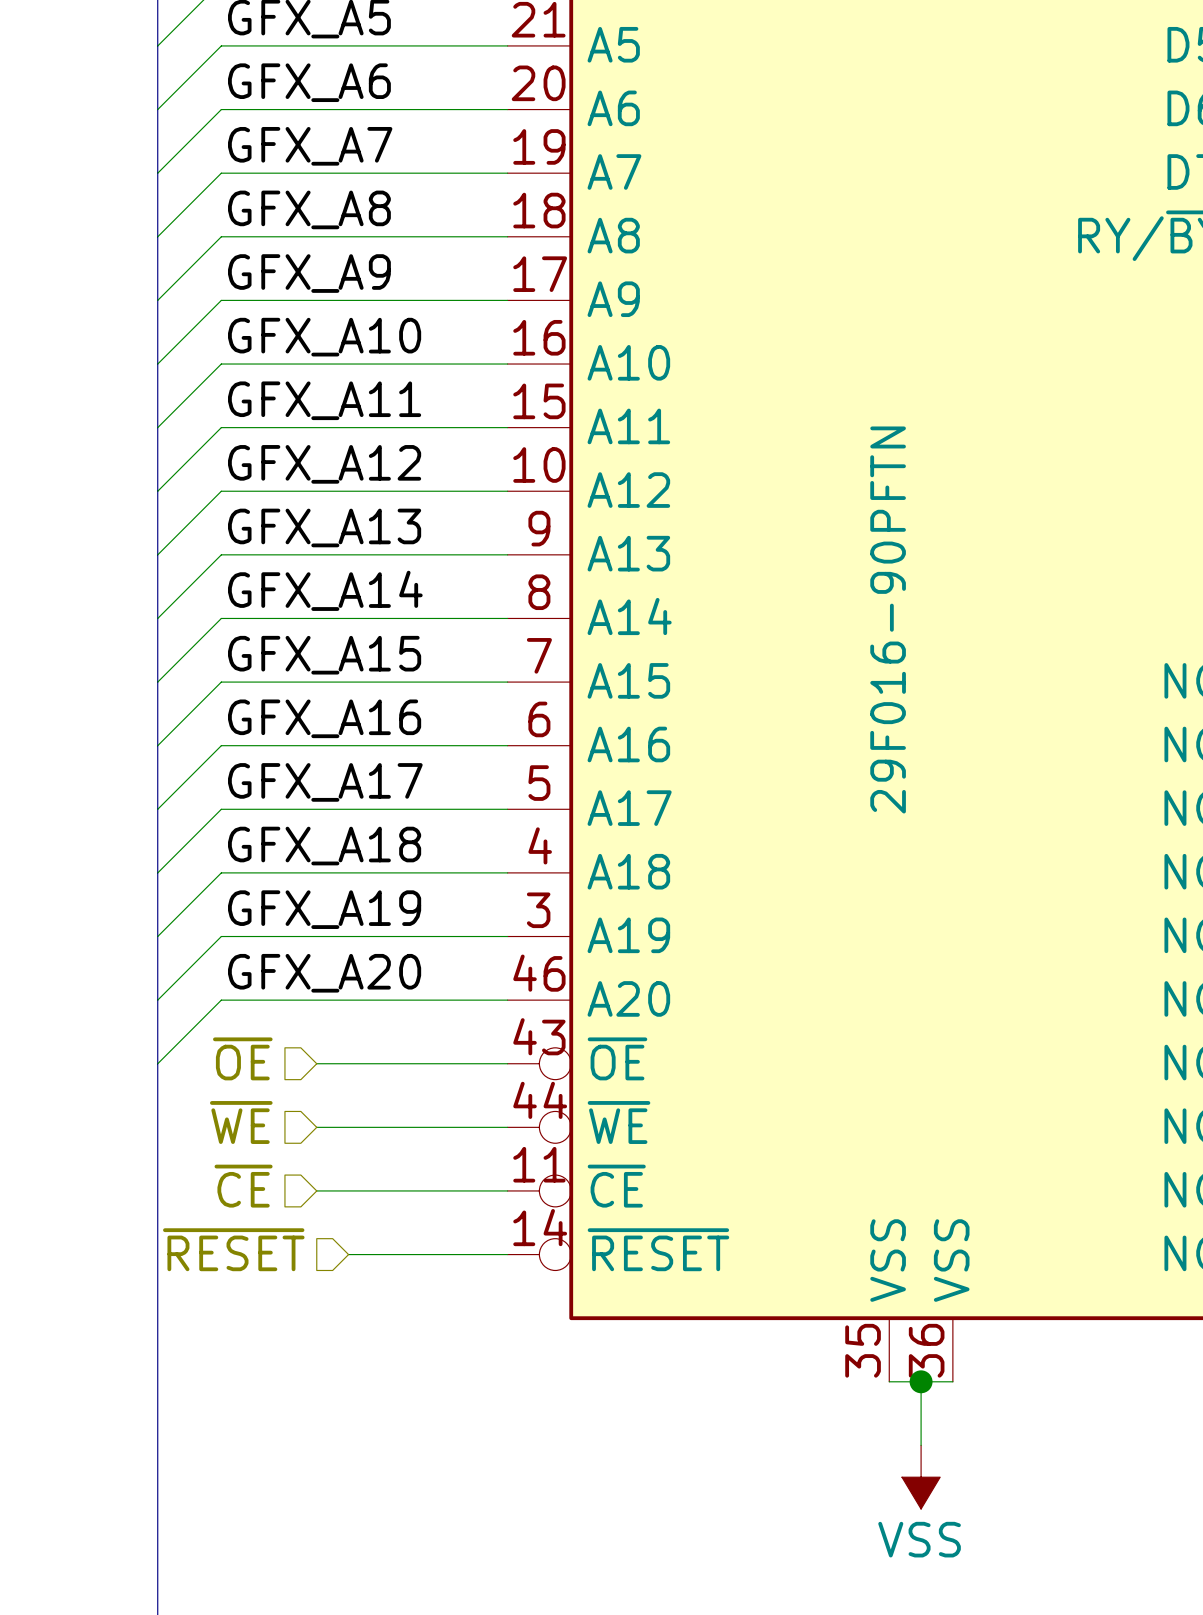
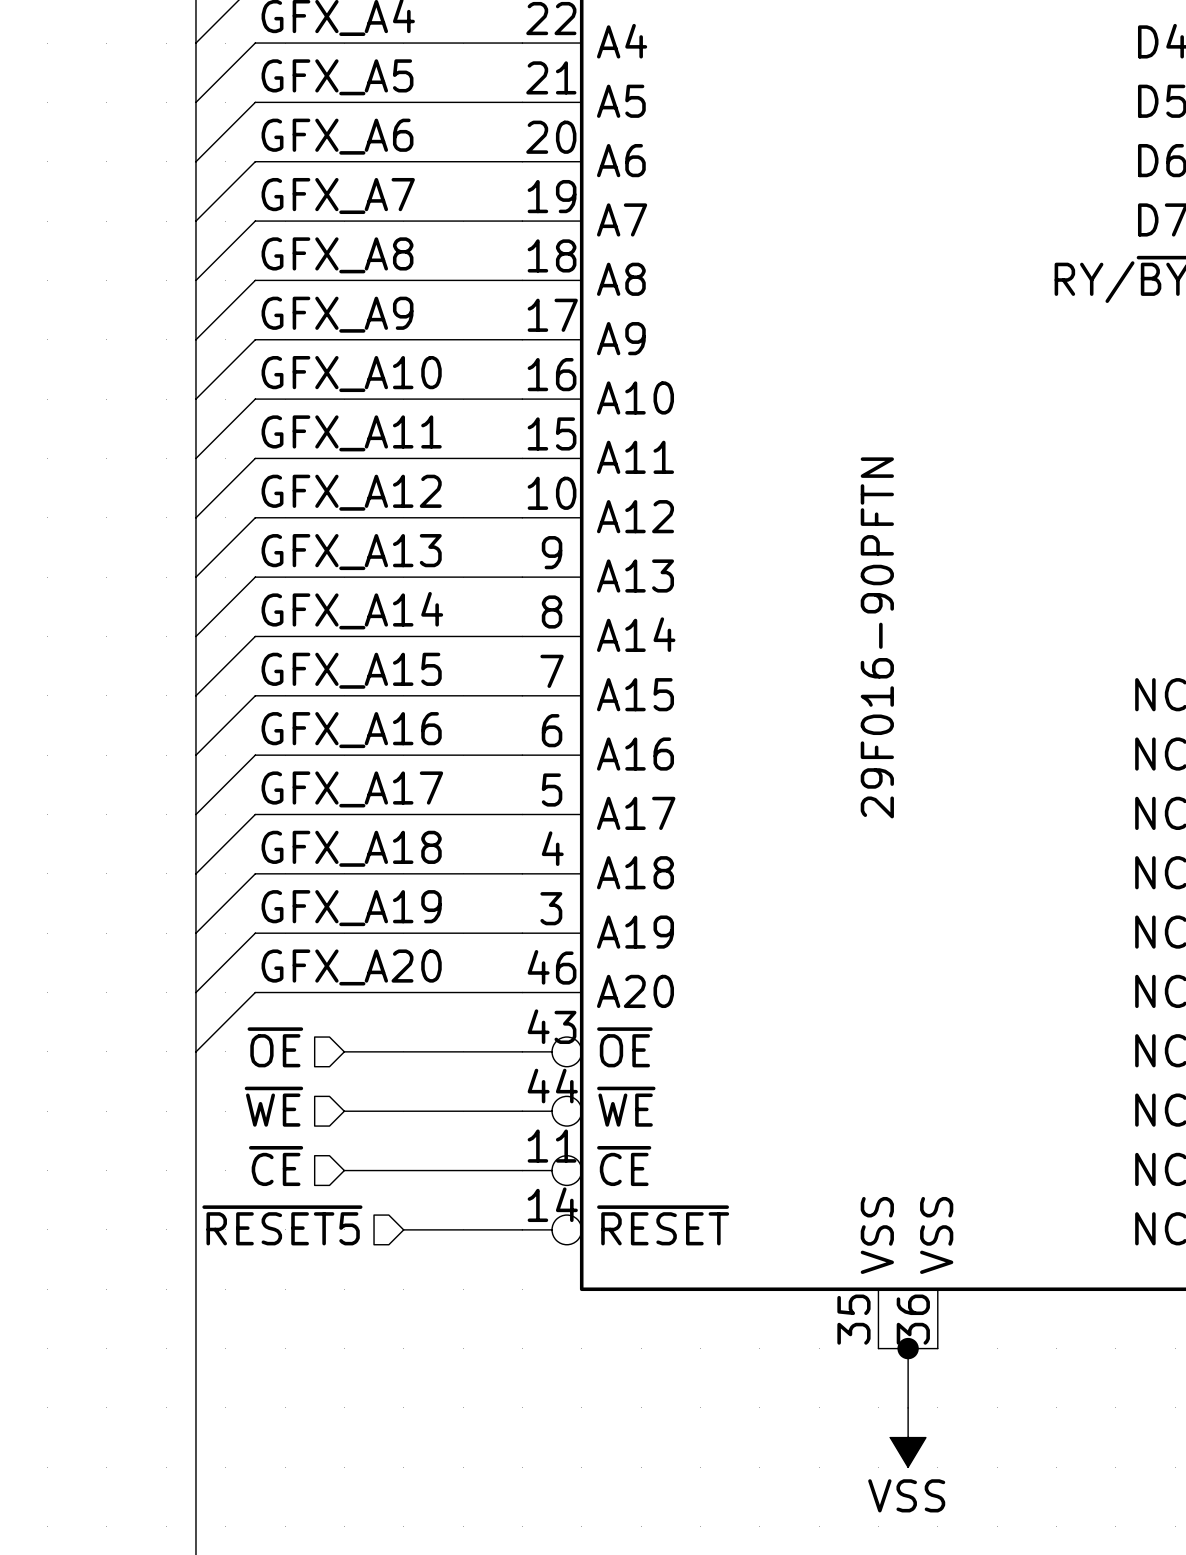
hierarchical label: ~{RESET} (233, 1249) -> ~{RESET5} (282, 1225)
wire: (348, 1254) (380, 1254) -> none

